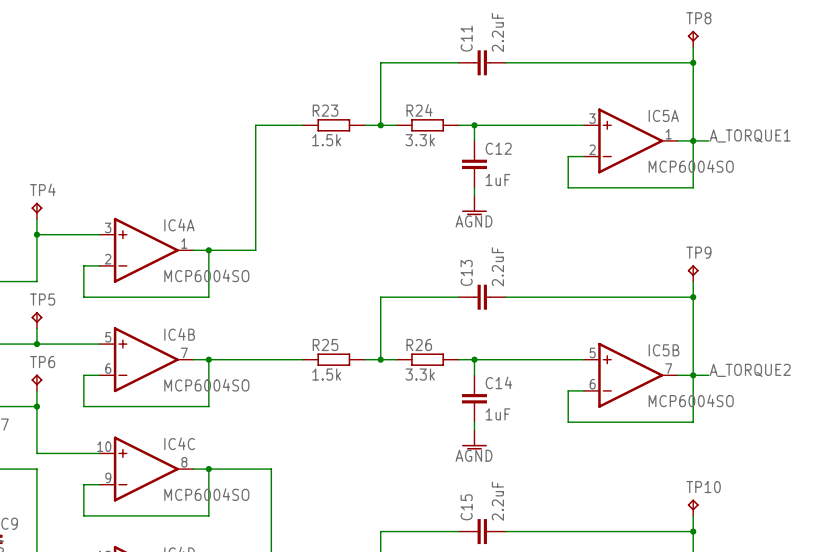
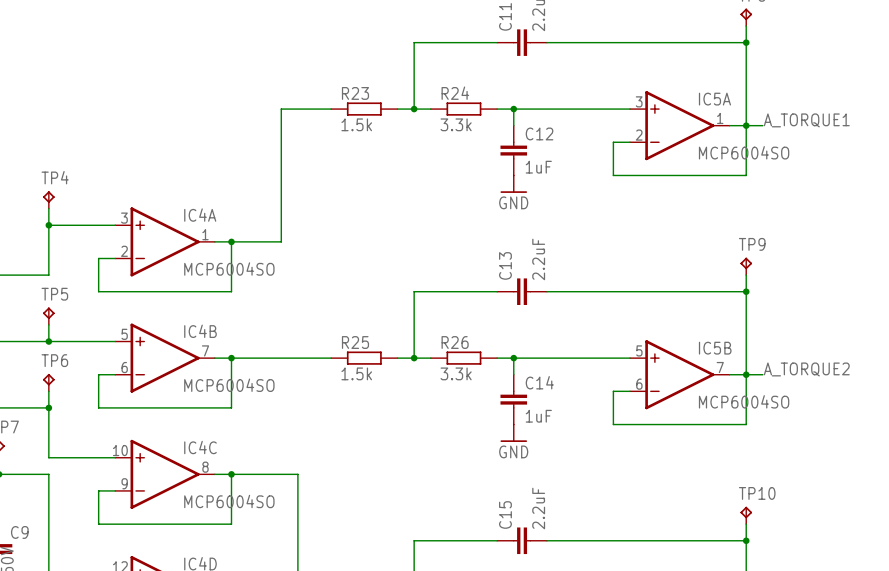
power symbol: none -> GND (513, 184)
power symbol: AGND (474, 205) -> none
power symbol: none -> GND (513, 433)
power symbol: AGND (474, 439) -> none

